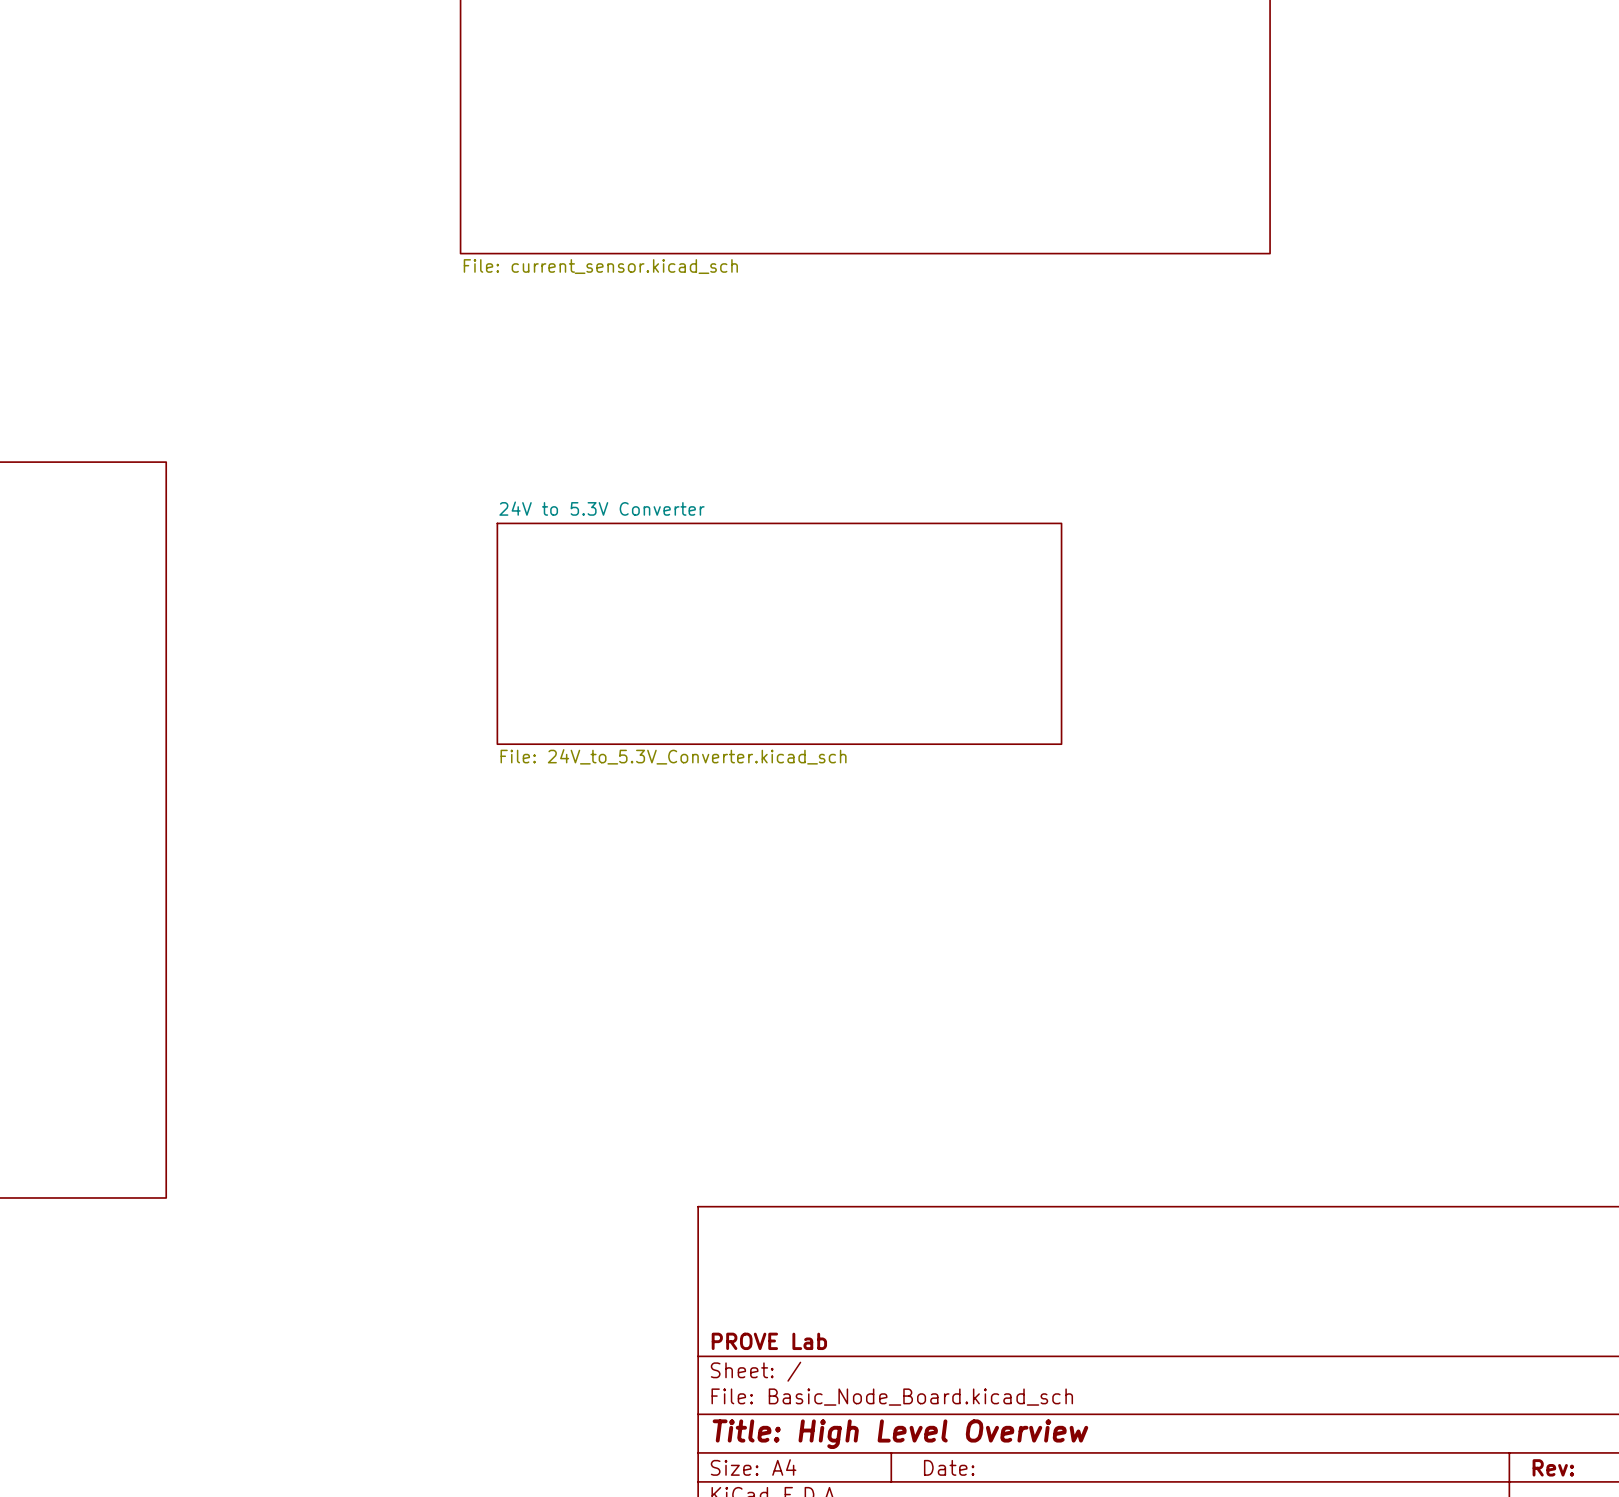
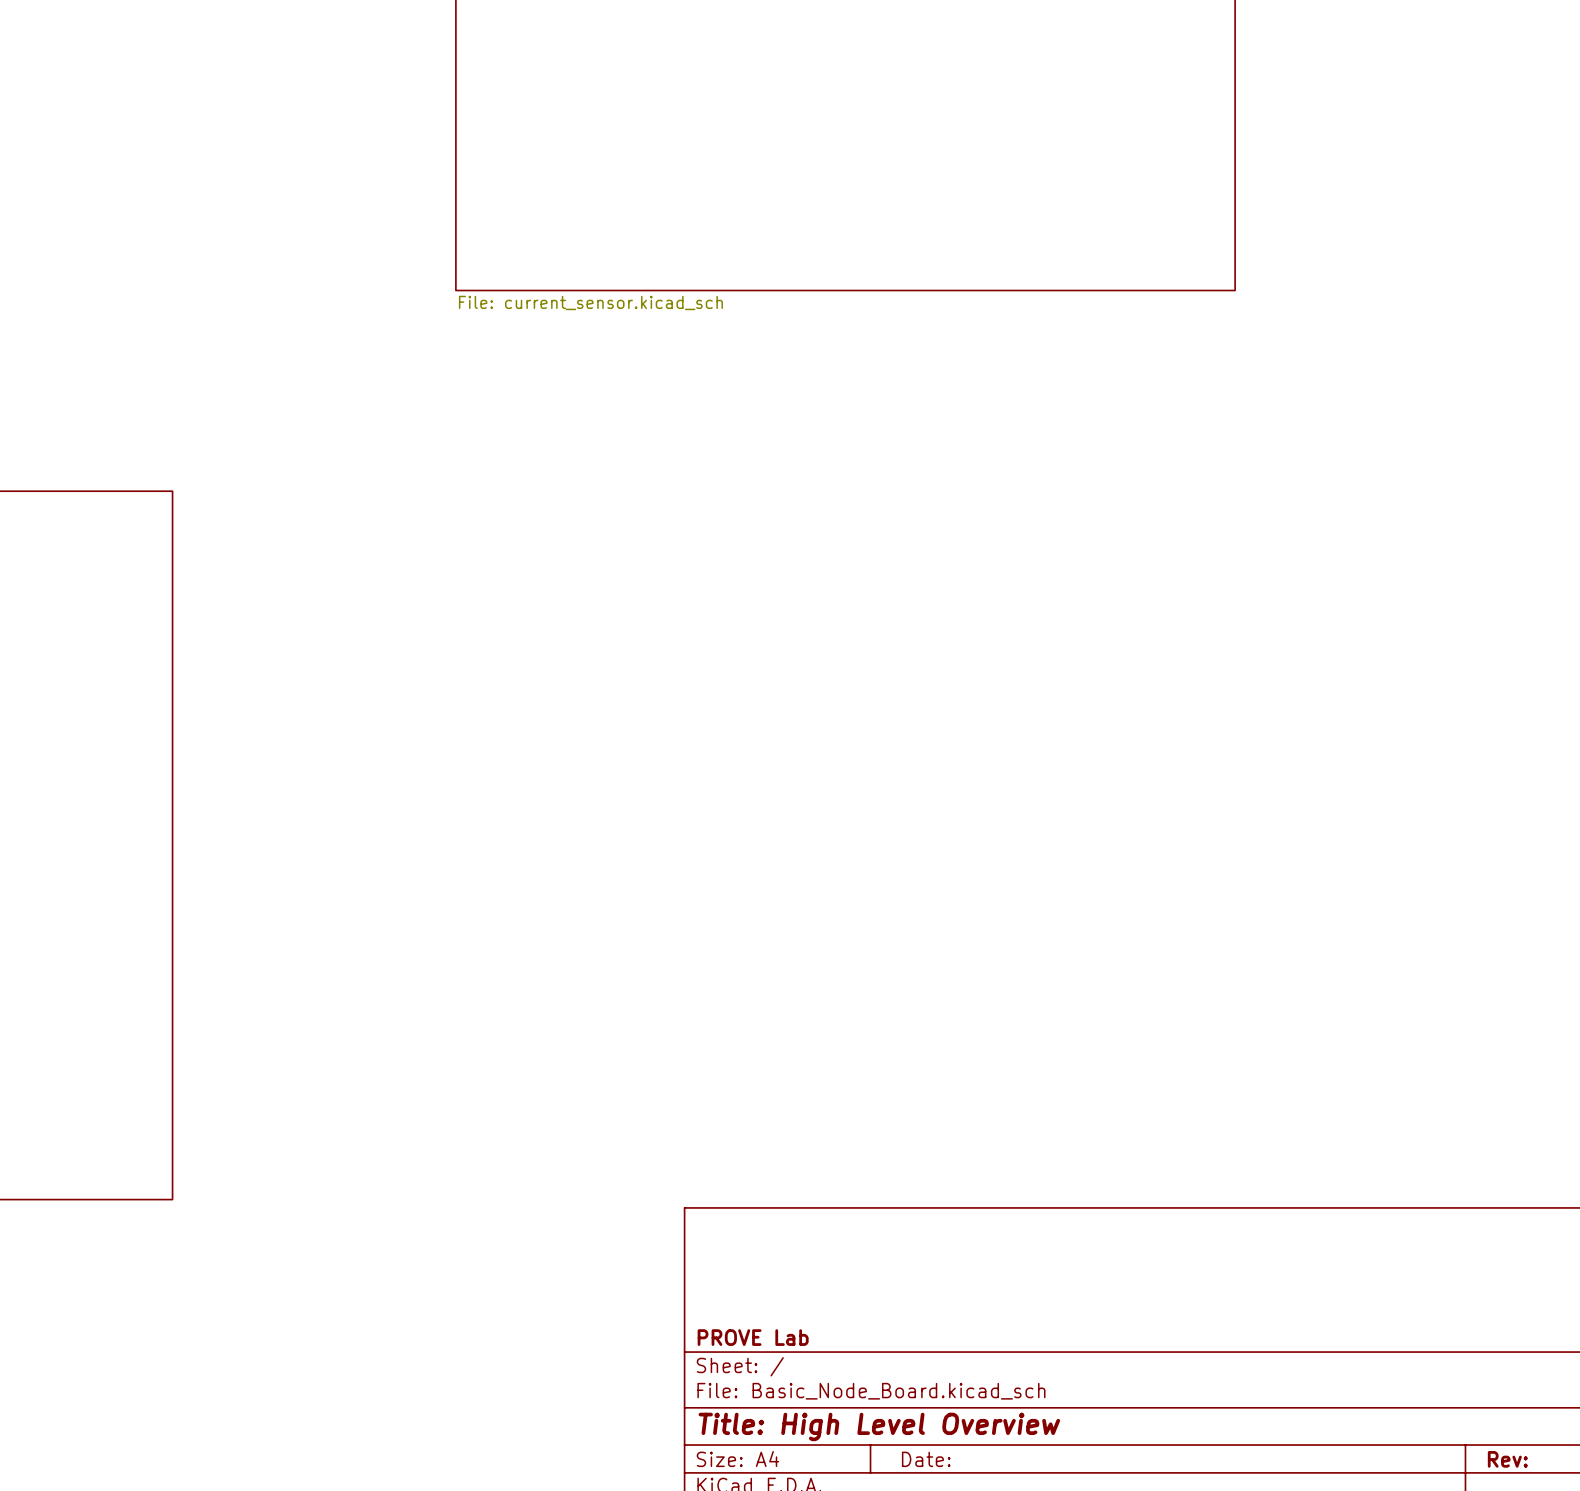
sheet 24V to 5.3V Converter: File: 24V_to_5.3V_Converter.kicad_sch (779, 633) -> none

